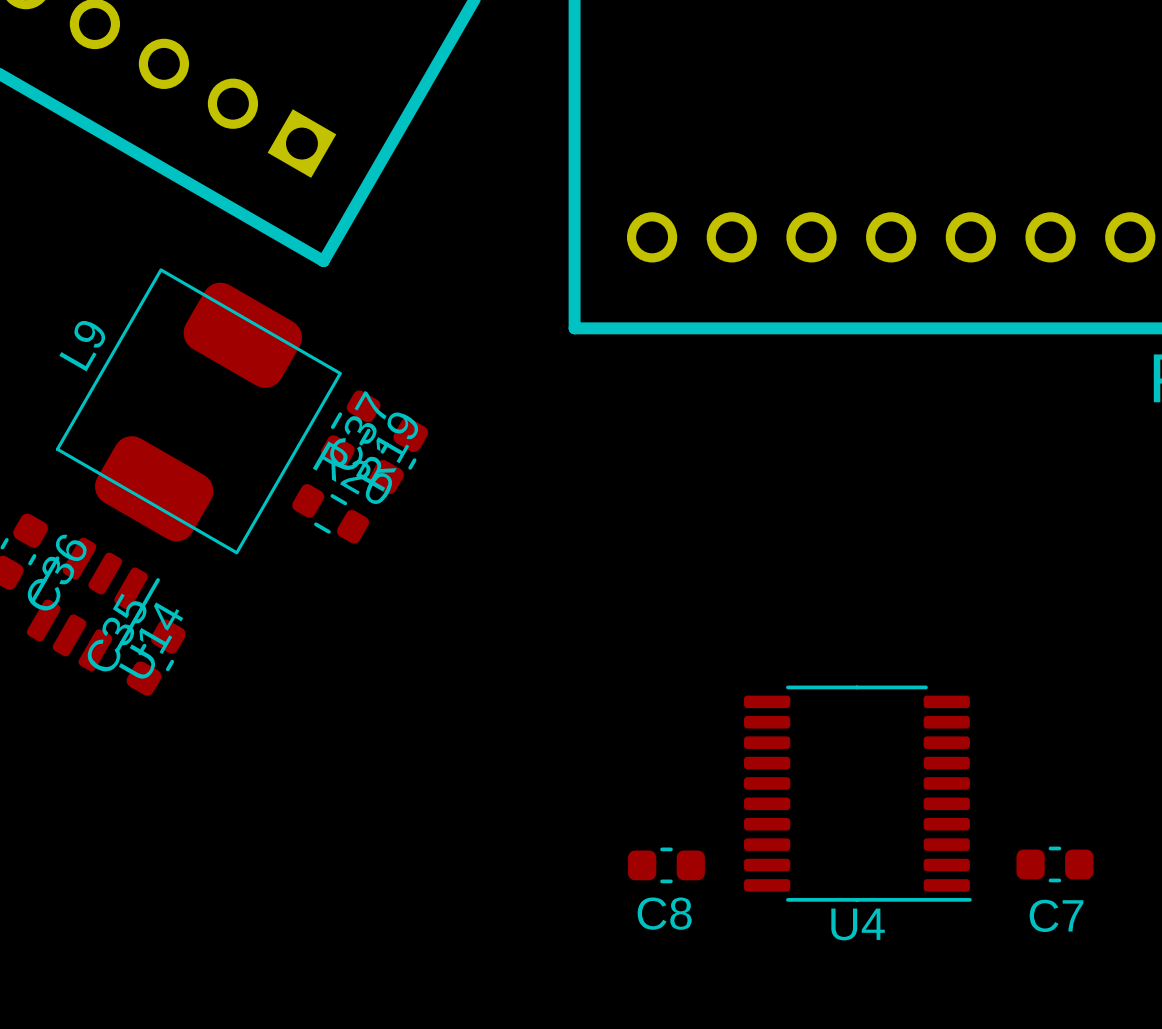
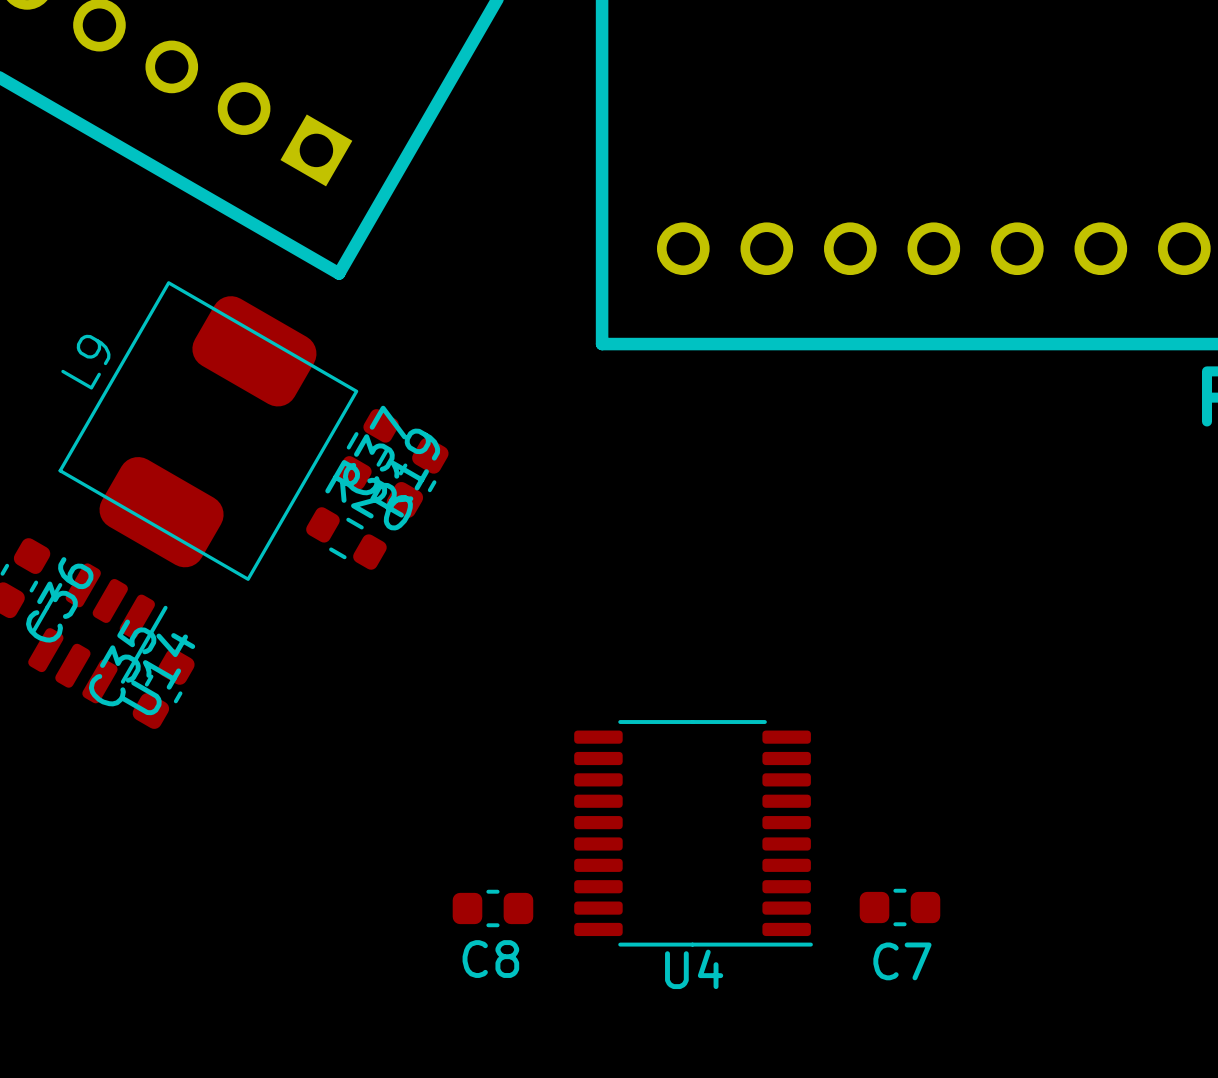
U4 position: (857, 793) -> (693, 833)
C7 position: (1054, 864) -> (899, 907)
C8 position: (666, 865) -> (492, 908)

